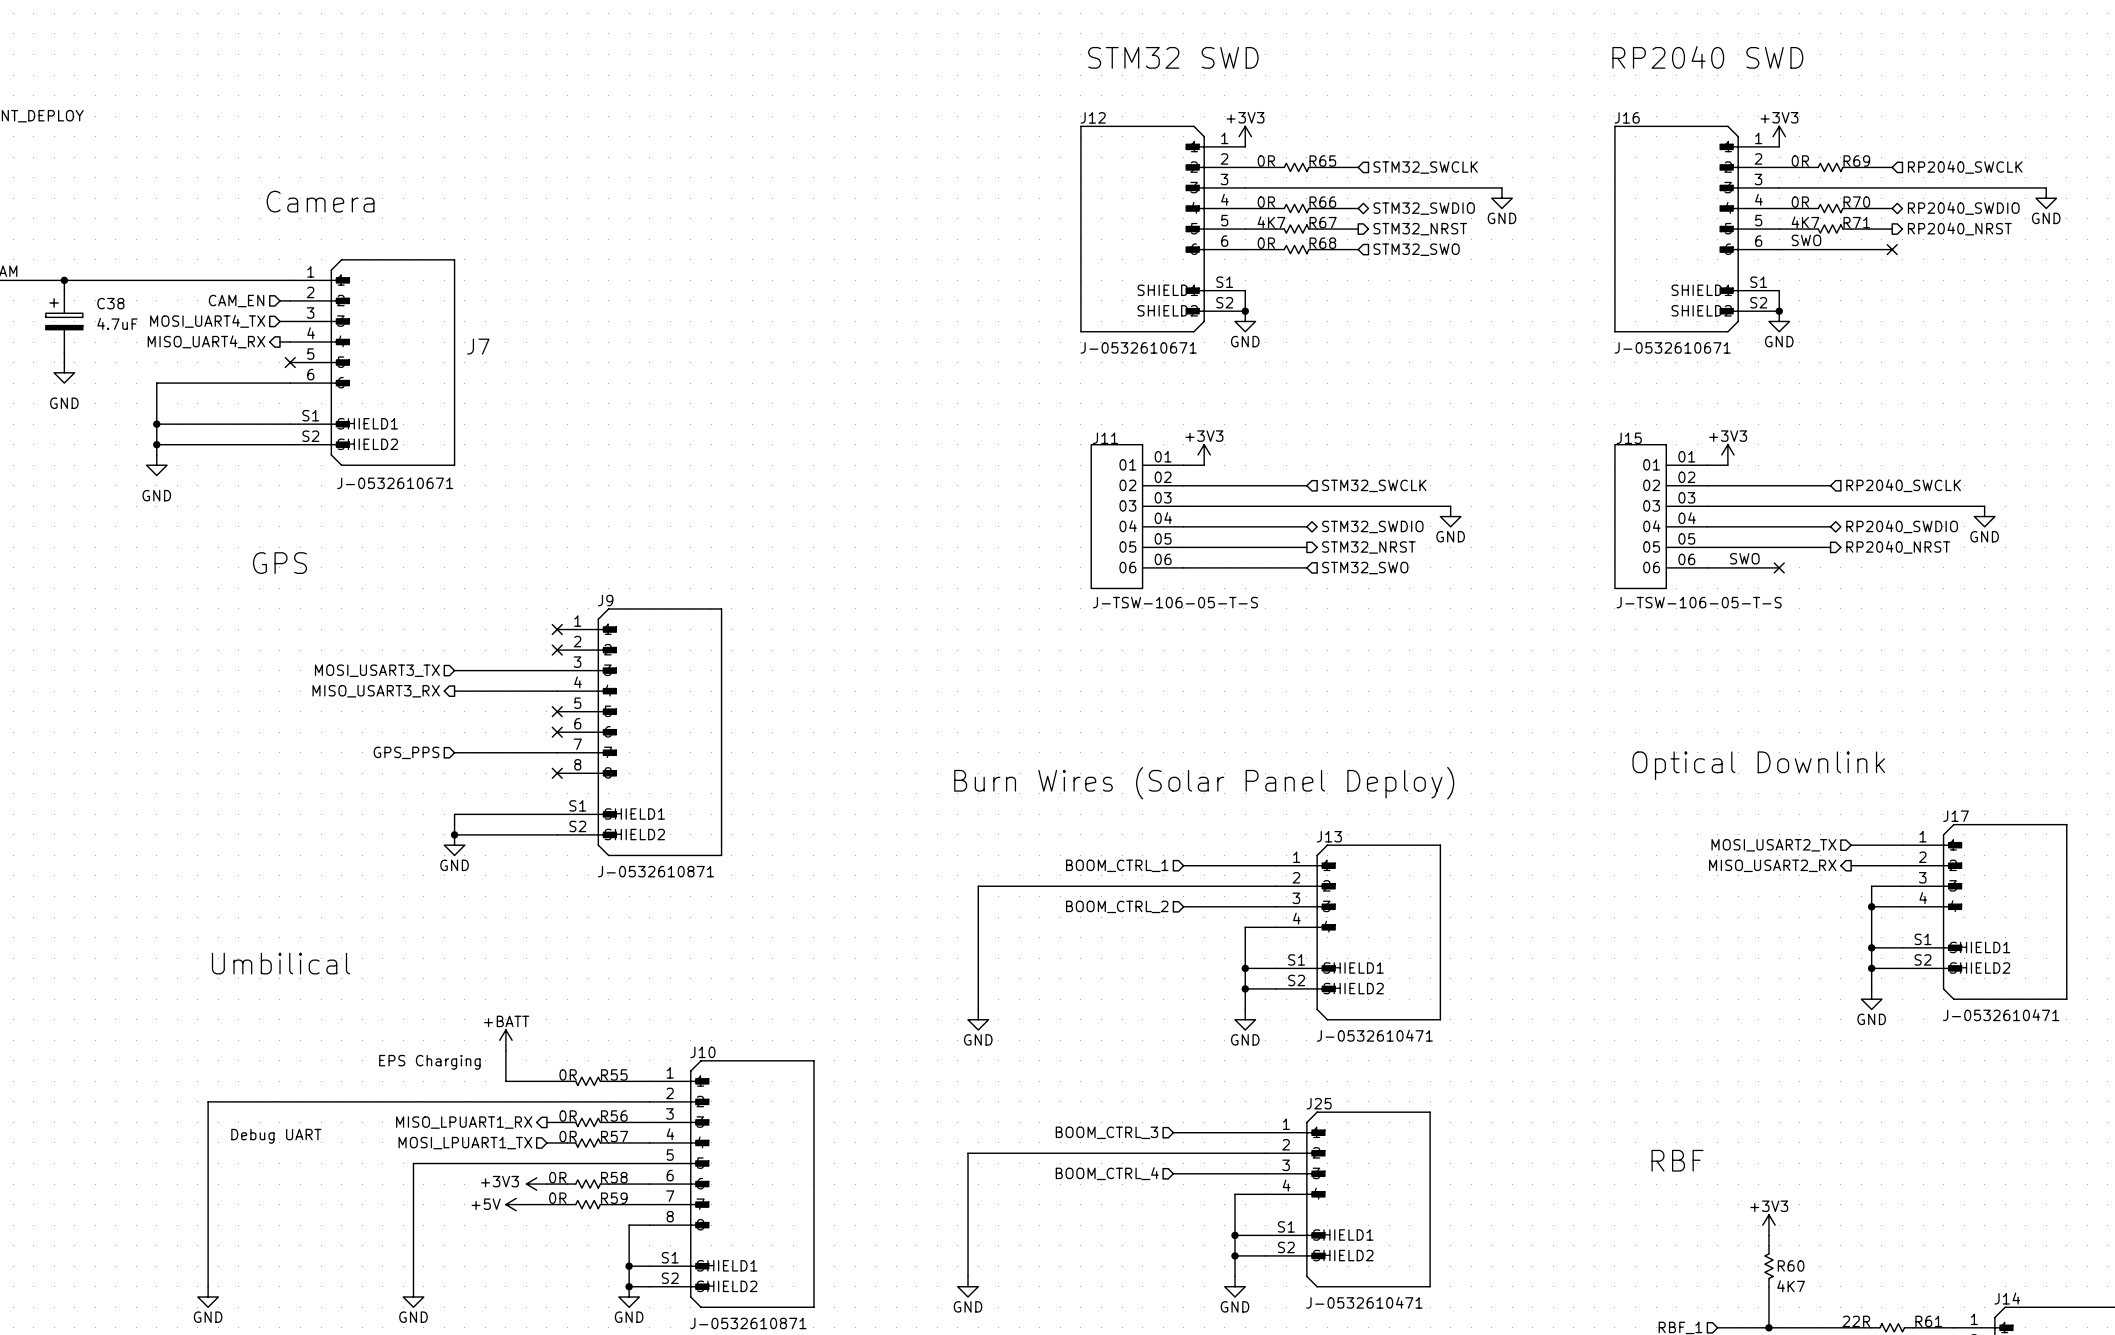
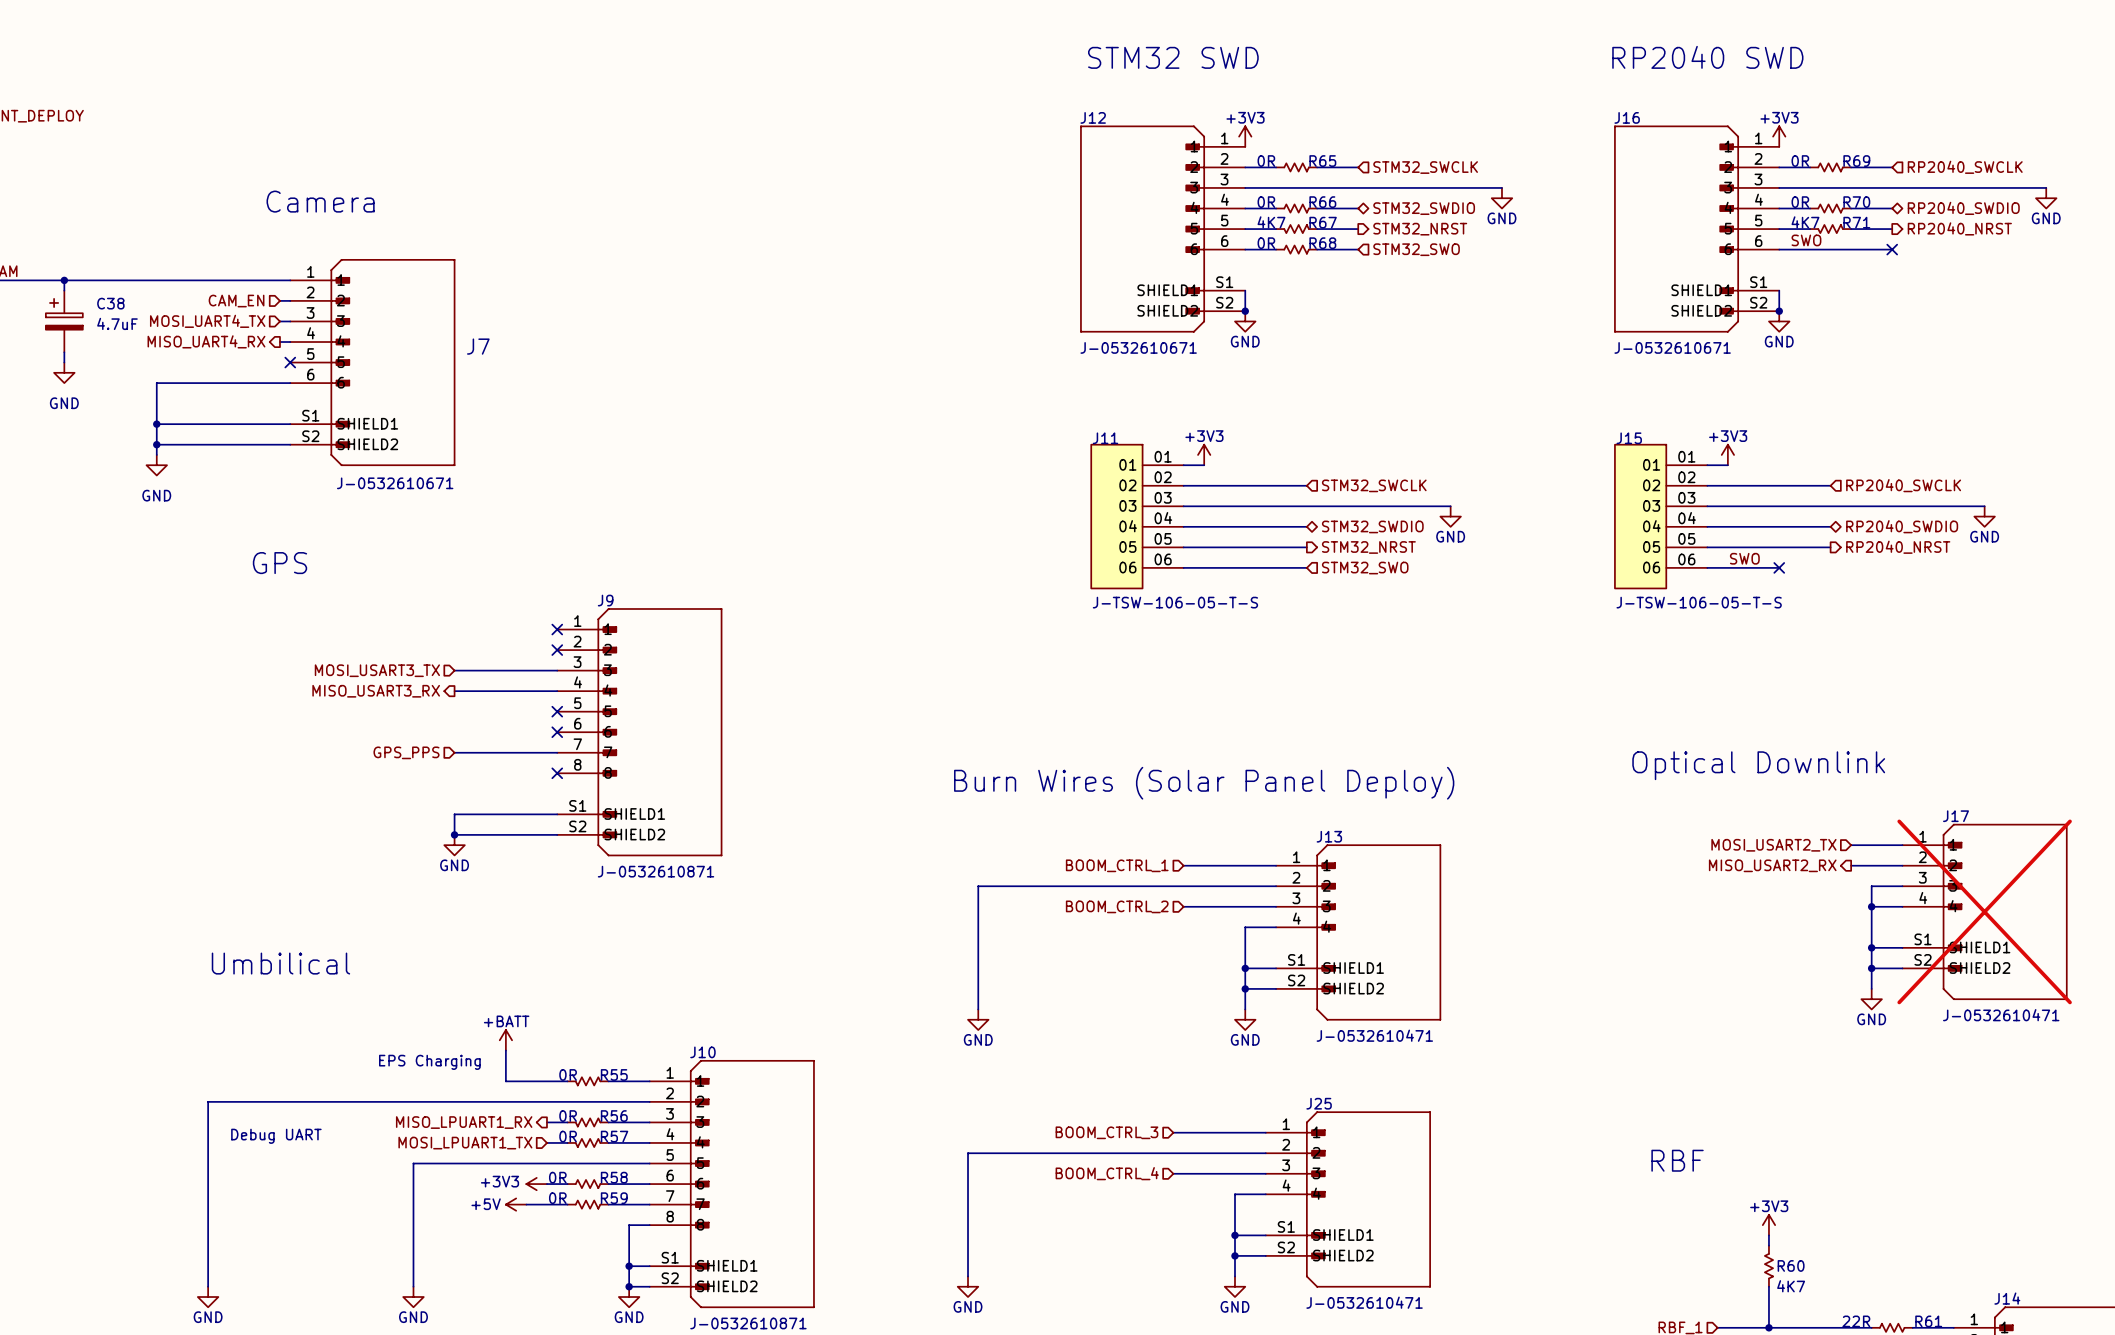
J17 do-not-place cross: none -> (1984, 911)

